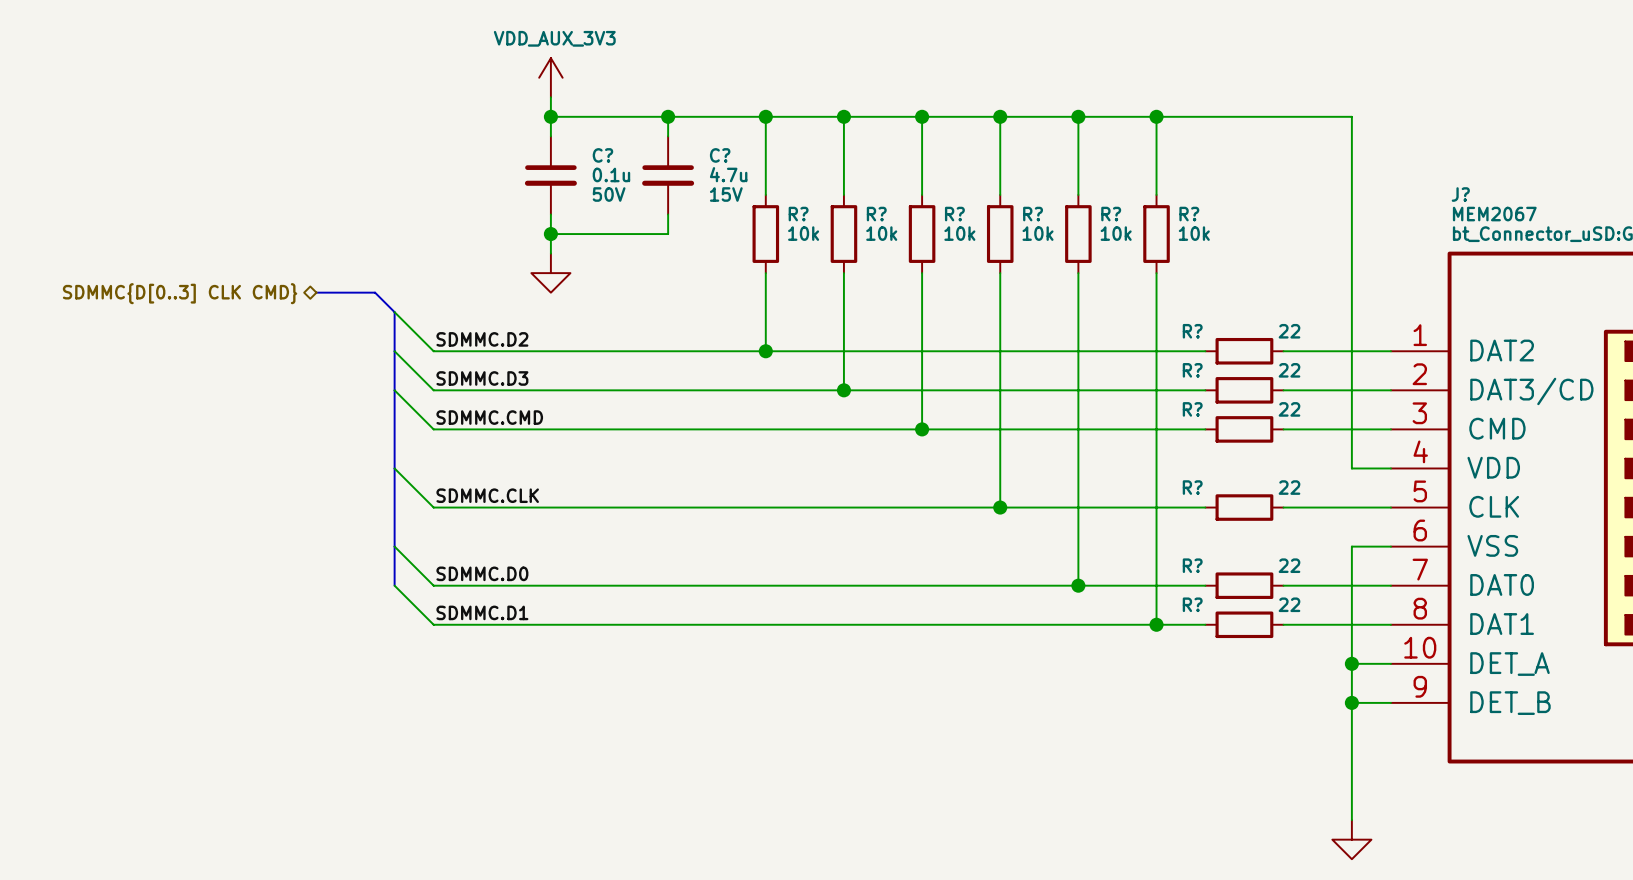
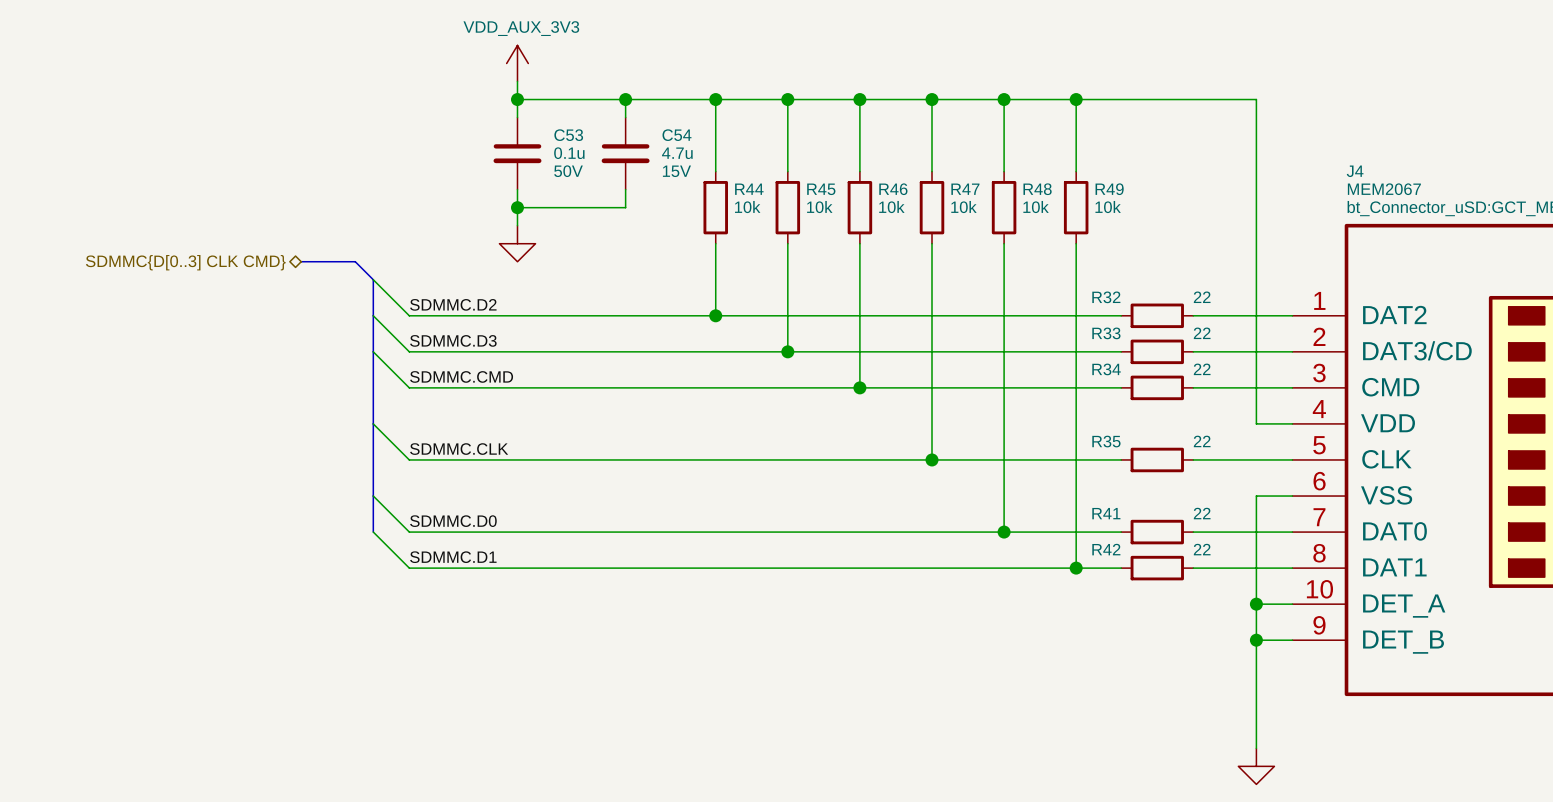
C? name: C? (602, 155) -> C53 (568, 135)
C? name: C? (720, 155) -> C54 (676, 135)
J? name: J? (1460, 194) -> J4 (1355, 171)
R? name: R? (798, 214) -> R44 (749, 189)
R? name: R? (876, 214) -> R45 (821, 189)
R? name: R? (954, 214) -> R46 (893, 189)
R? name: R? (1033, 214) -> R47 (965, 189)
R? name: R? (1111, 214) -> R48 (1037, 189)
R? name: R? (1189, 214) -> R49 (1109, 189)
R? name: R? (1192, 331) -> R32 (1106, 297)
R? name: R? (1192, 370) -> R33 (1106, 333)
R? name: R? (1192, 409) -> R34 (1106, 369)
R? name: R? (1192, 487) -> R35 (1106, 441)
R? name: R? (1192, 565) -> R41 (1106, 513)
R? name: R? (1192, 604) -> R42 (1106, 549)

